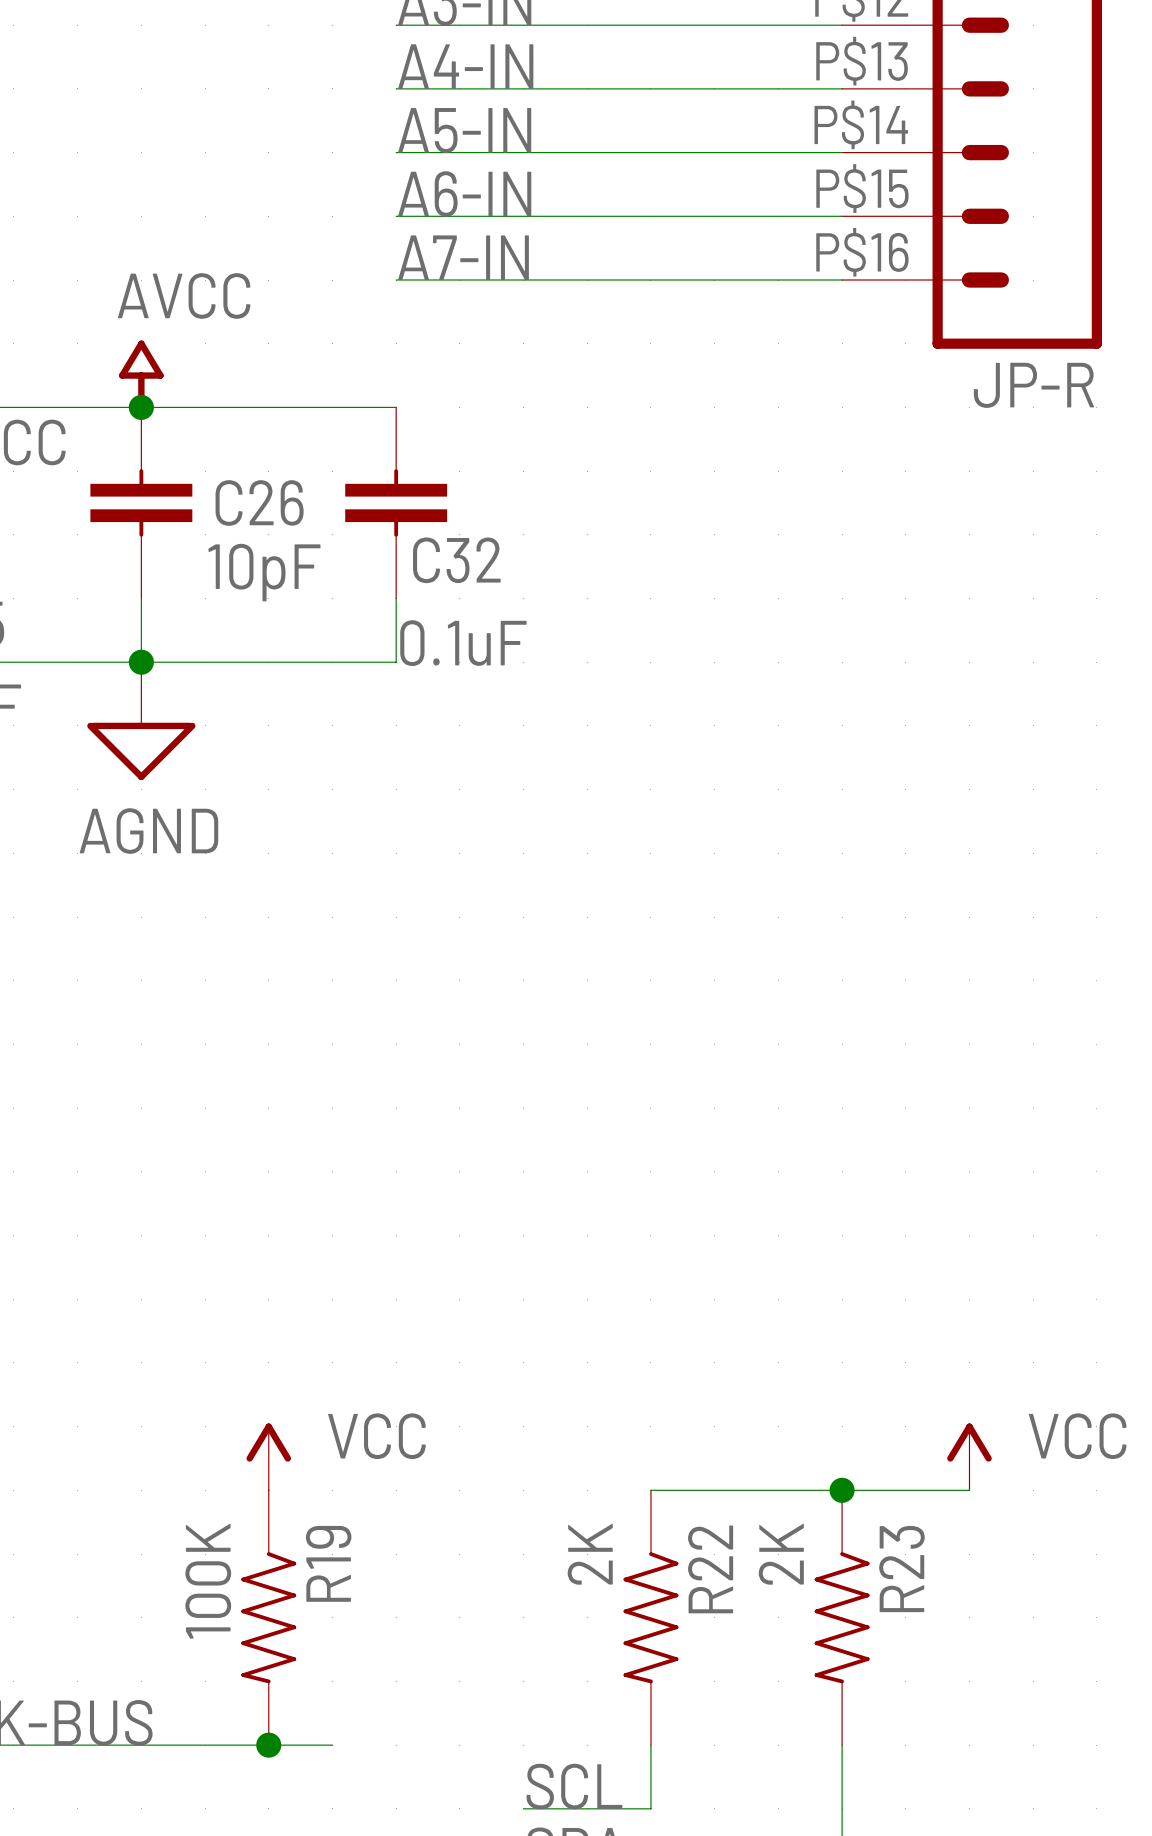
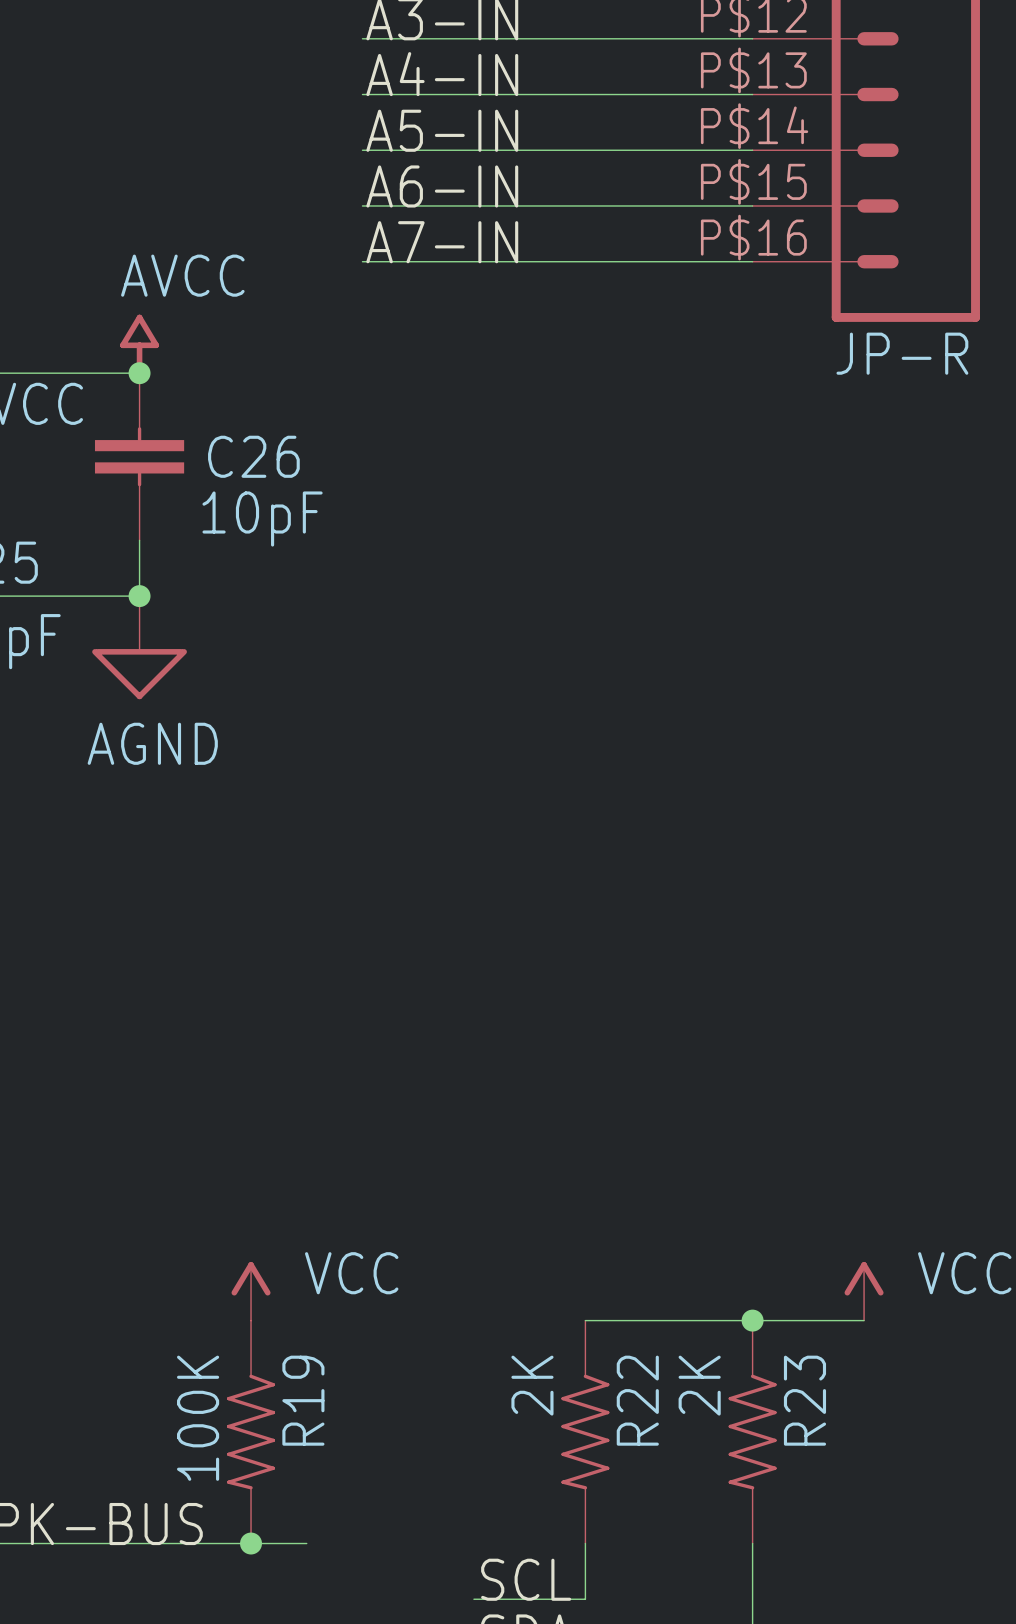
wire: (141, 407) (396, 407) -> none
C32: 0.1uF (396, 502) -> none
wire: (396, 598) (396, 662) (141, 662) -> none

